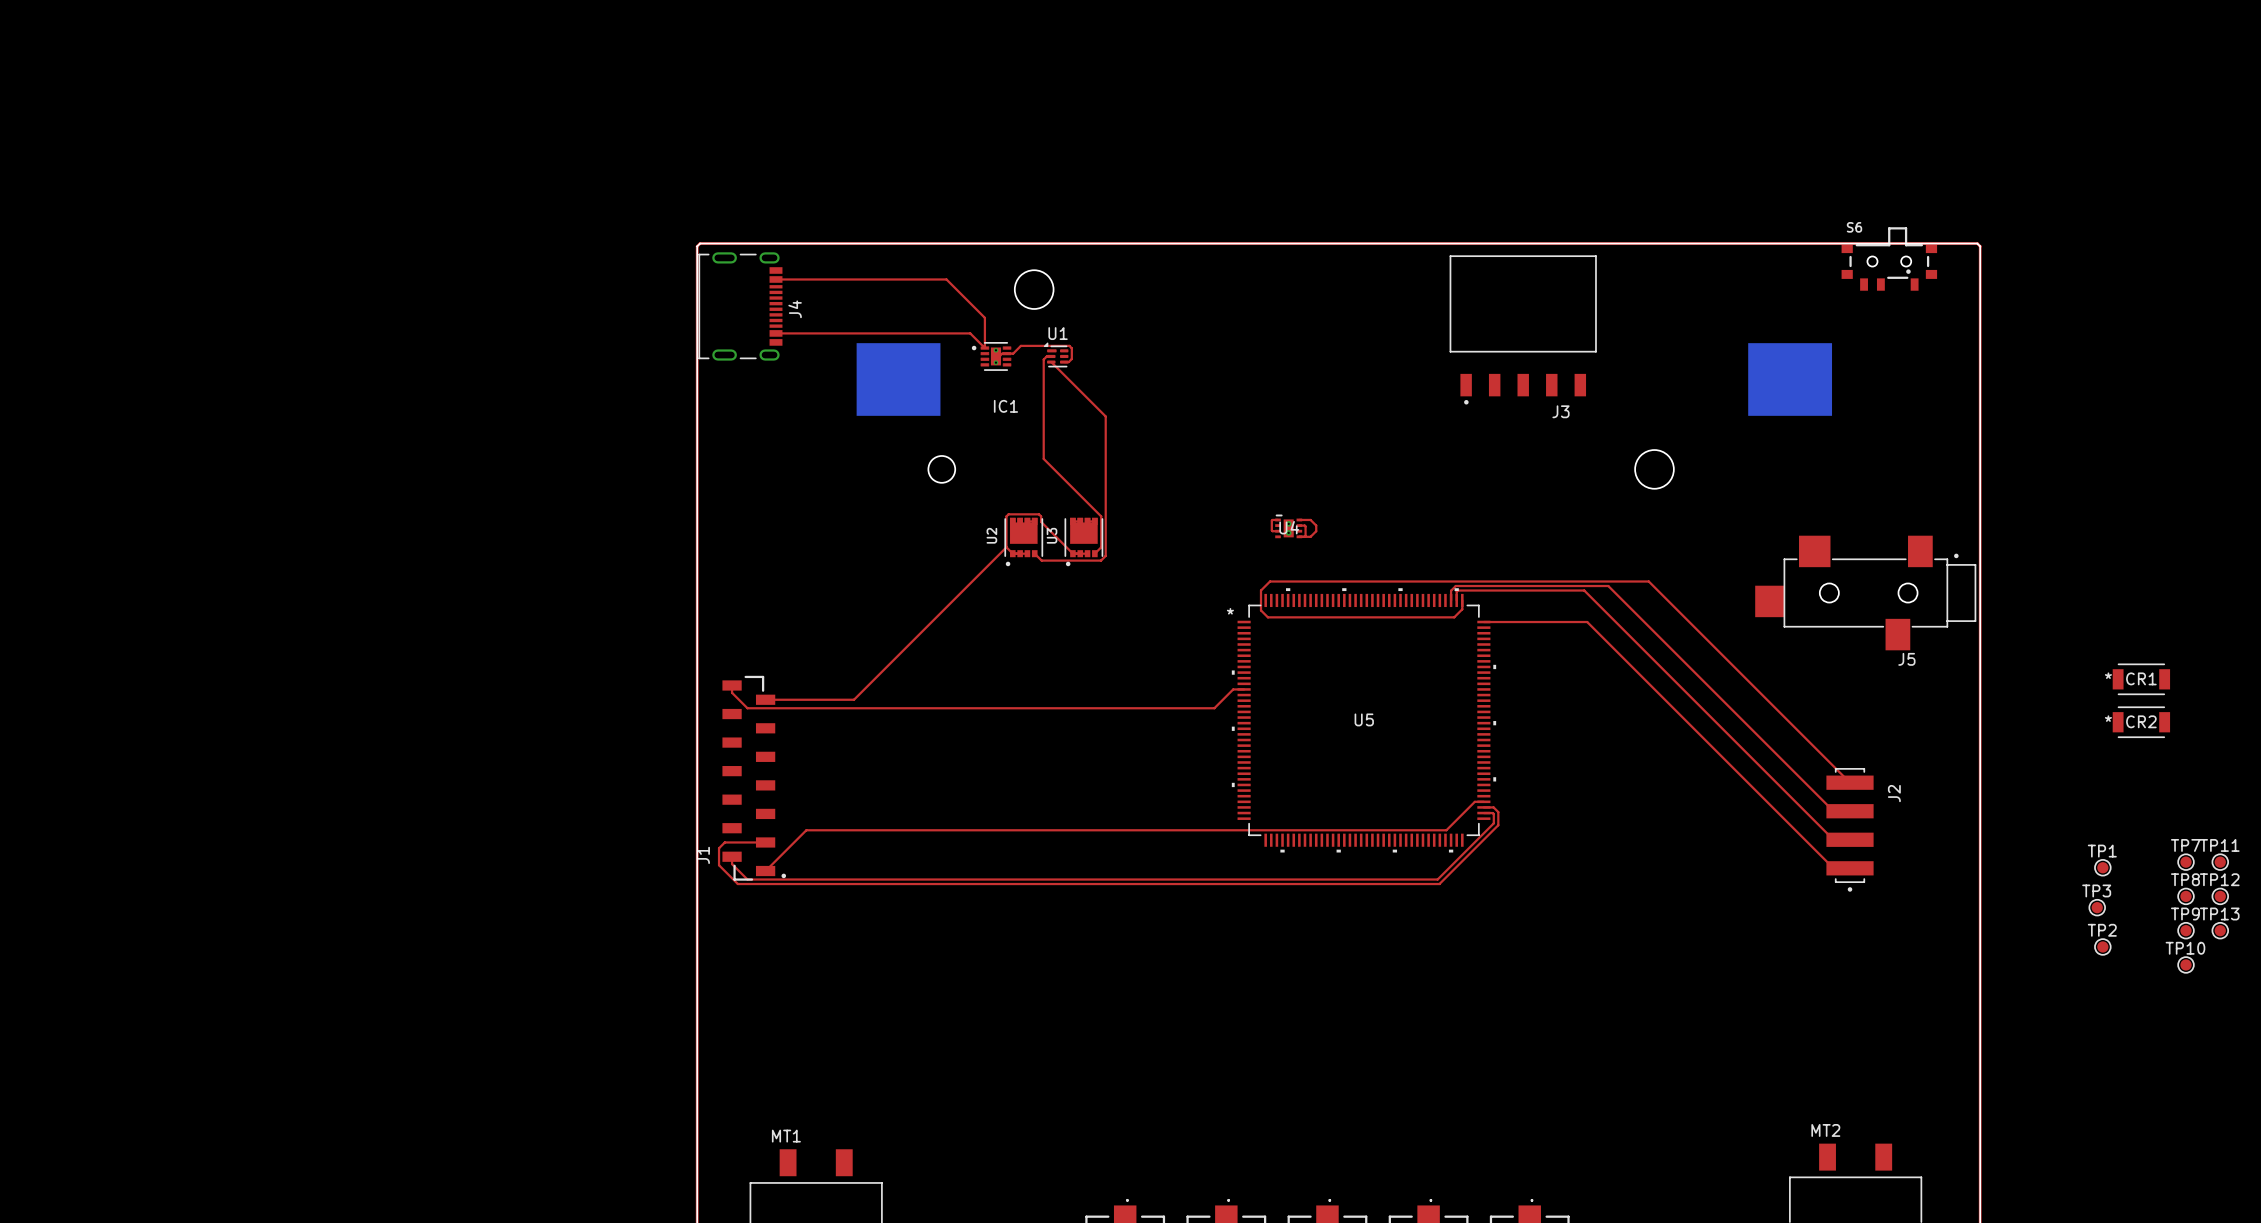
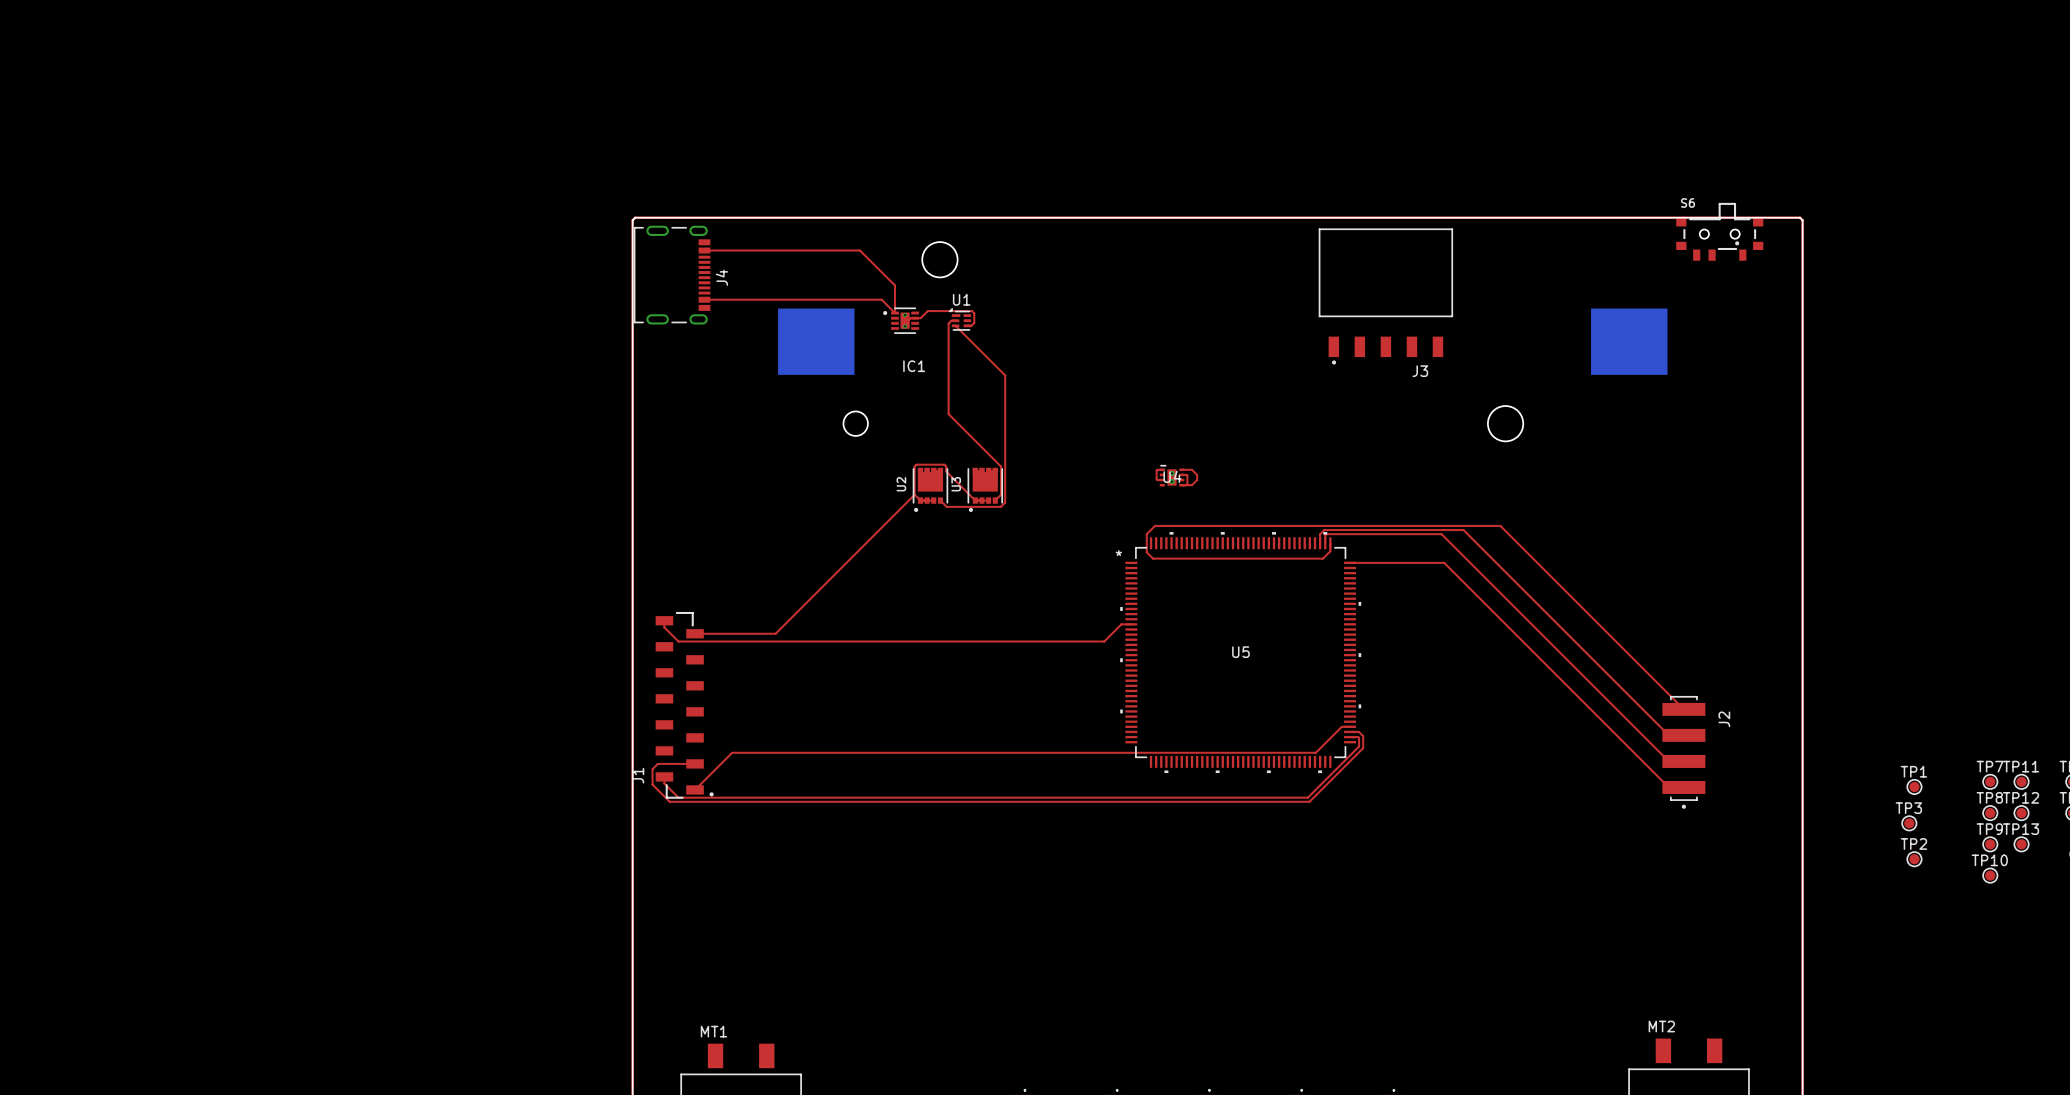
J5: (1865, 593) -> none
CR1: (2141, 679) -> none
CR2: (2141, 722) -> none

